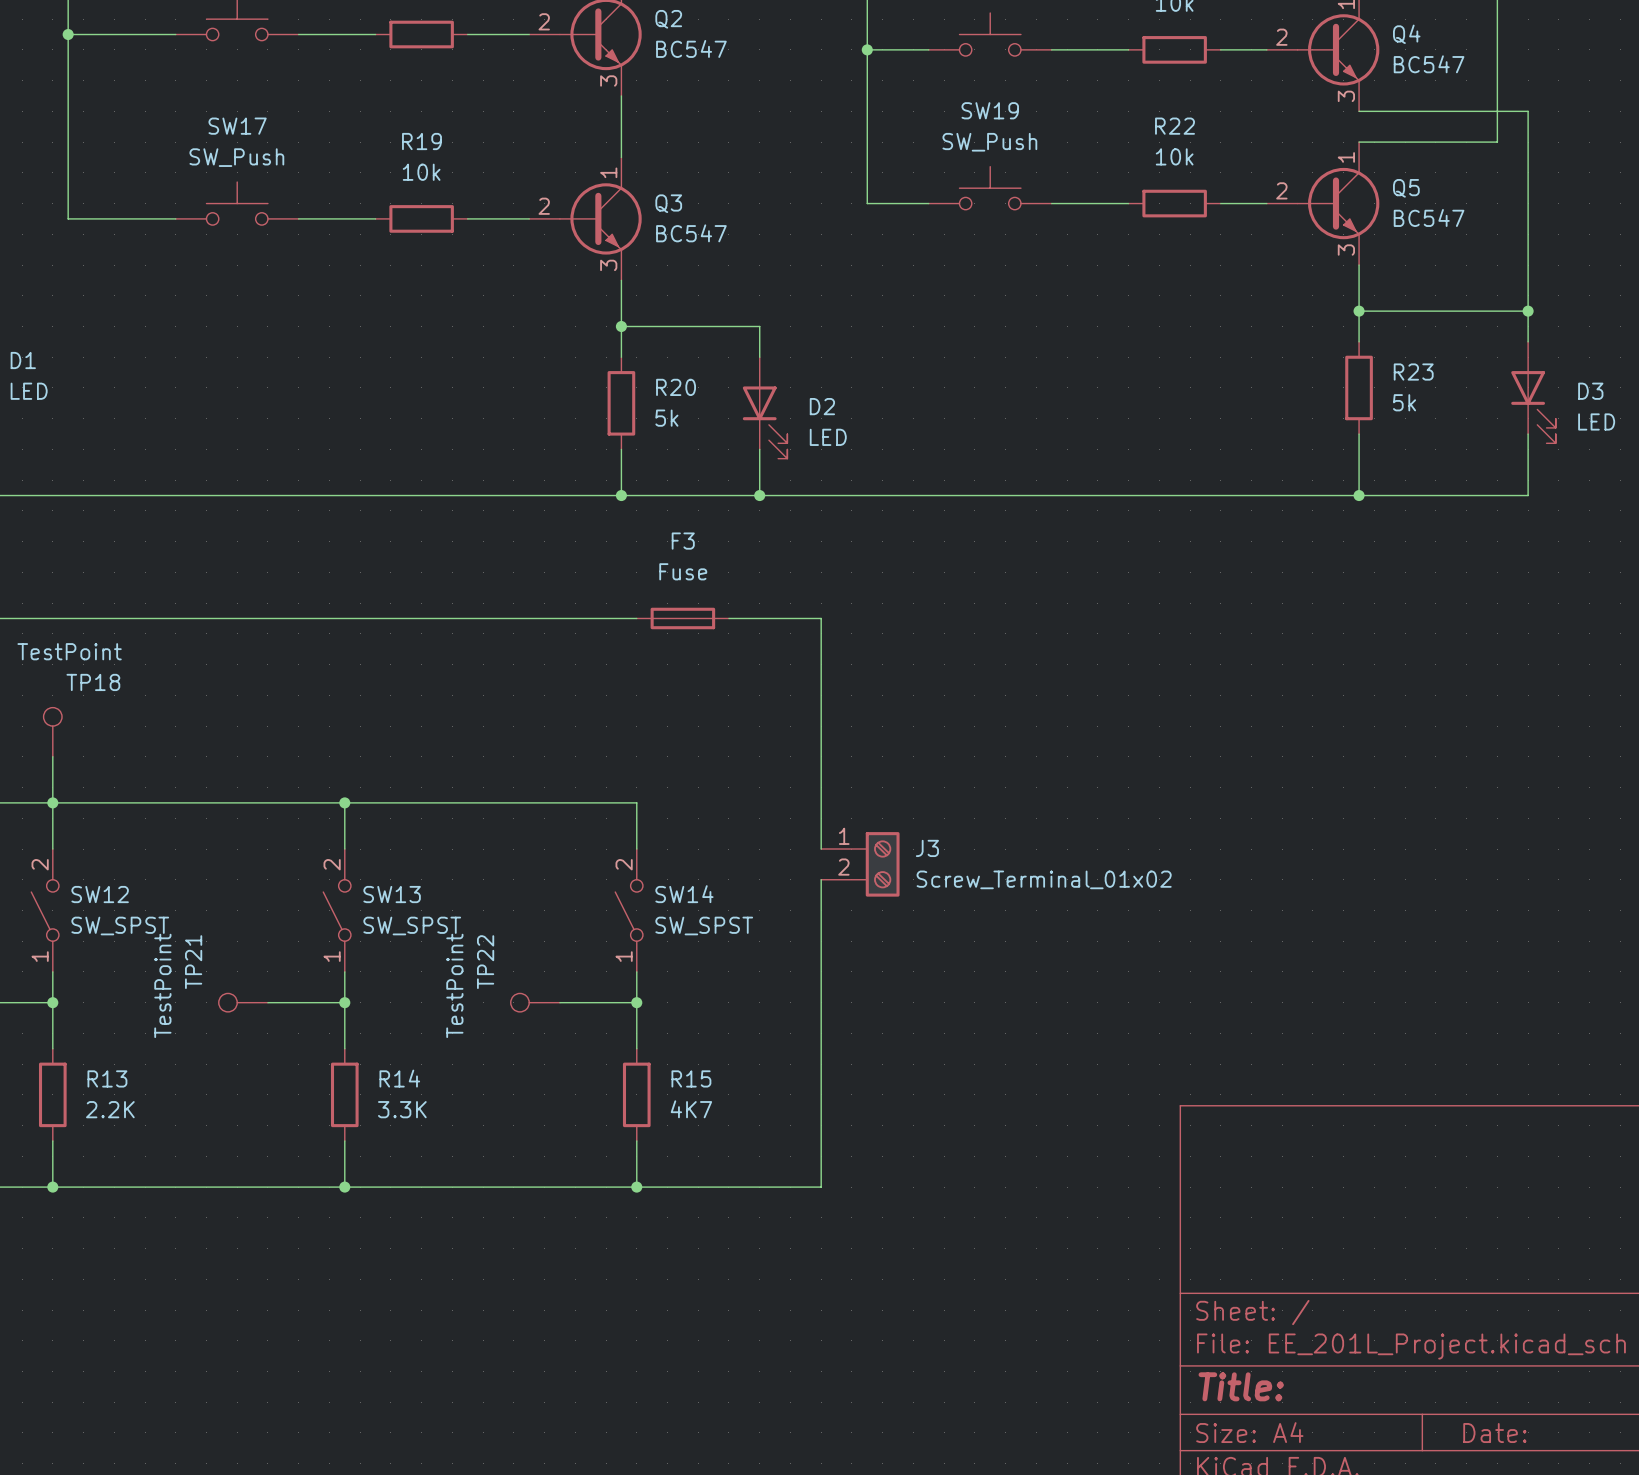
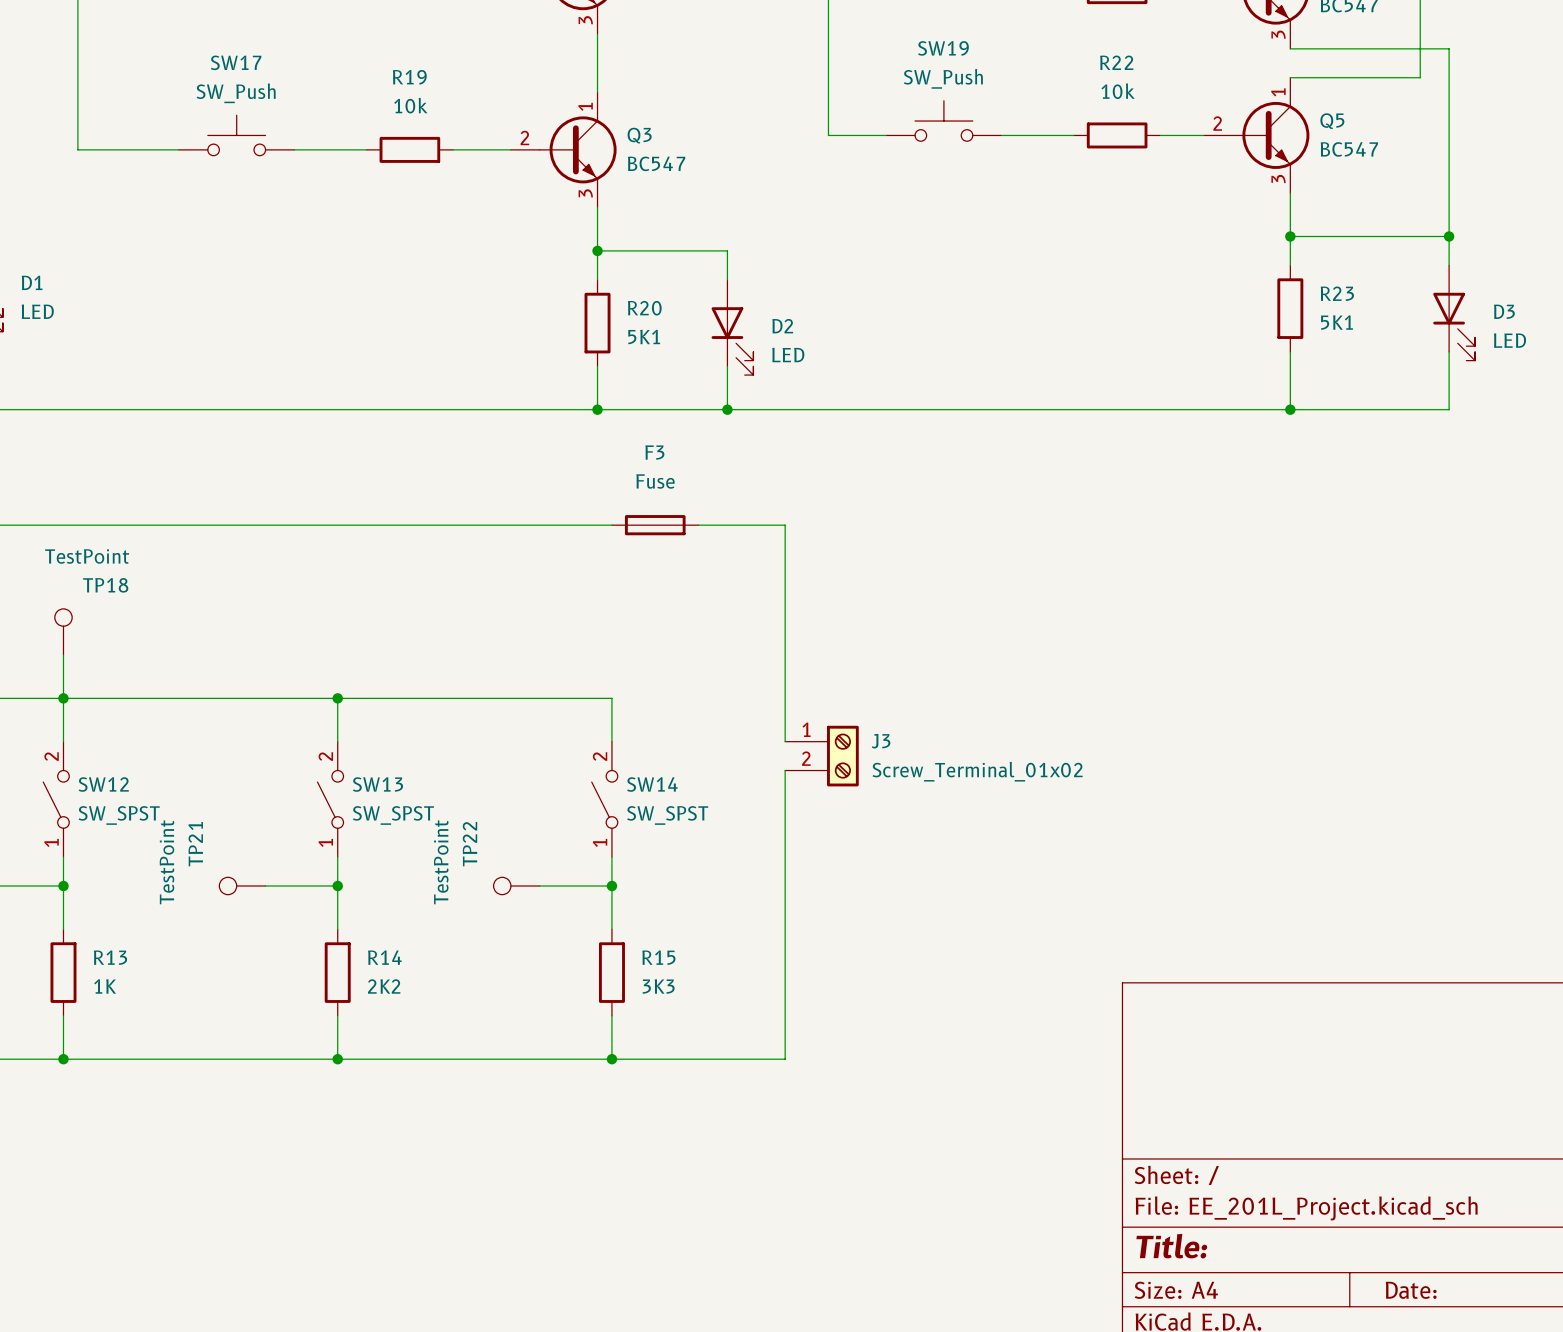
R23 value: 5k (1404, 402) -> 5K1 (1337, 322)
R20 value: 5k (666, 418) -> 5K1 (644, 336)
R13 value: 2.2K (110, 1109) -> 1K (105, 986)
R14 value: 3.3K (402, 1109) -> 2K2 (384, 986)
R15 value: 4K7 (691, 1109) -> 3K3 (658, 986)

